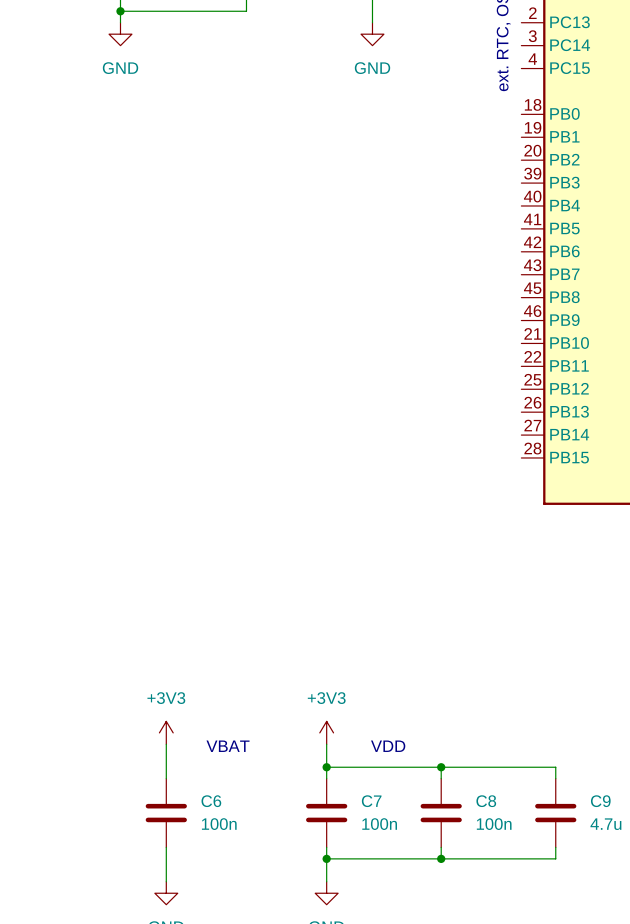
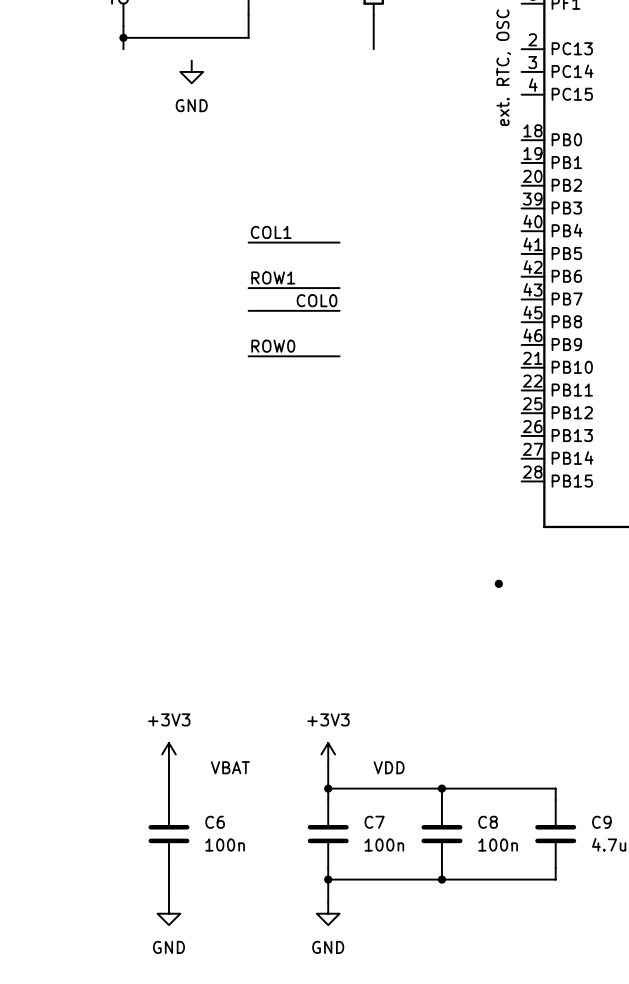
power symbol position: GND (120, 34) -> GND (191, 71)
power symbol: GND (372, 34) -> none
label: none -> COL1 (271, 232)
wire: none -> (248, 242) (339, 242)
label: none -> ROW1 (273, 277)
wire: none -> (248, 288) (339, 288)
label: none -> COL0 (317, 300)
wire: none -> (248, 310) (339, 310)
label: none -> ROW0 (273, 346)
wire: none -> (248, 356) (339, 356)
junction: none -> (498, 583)

